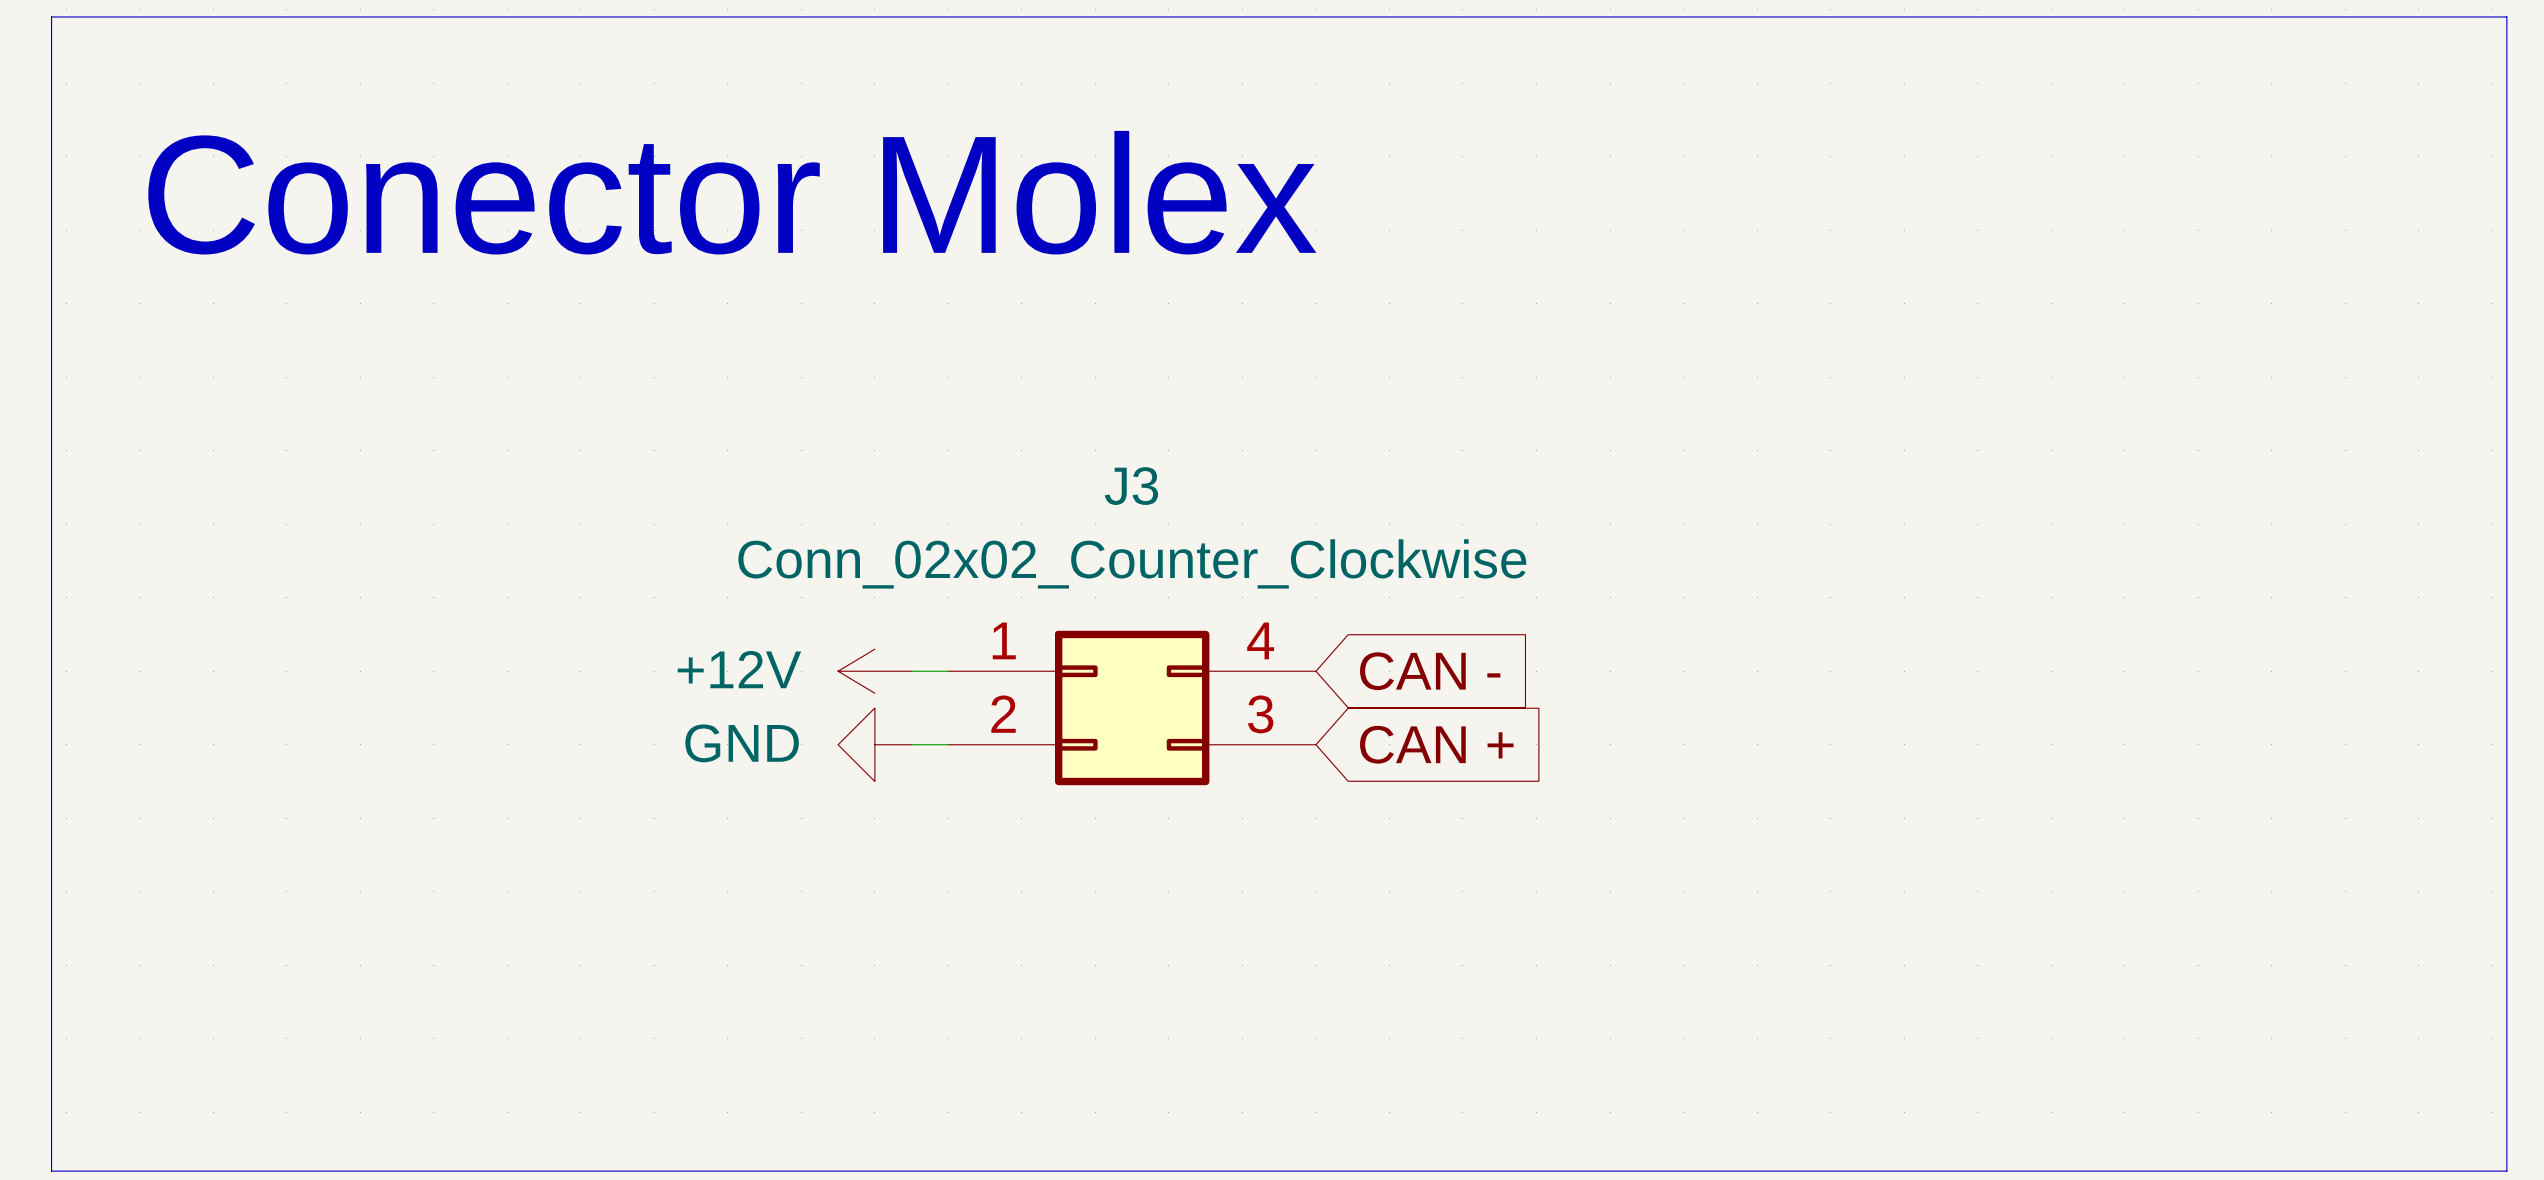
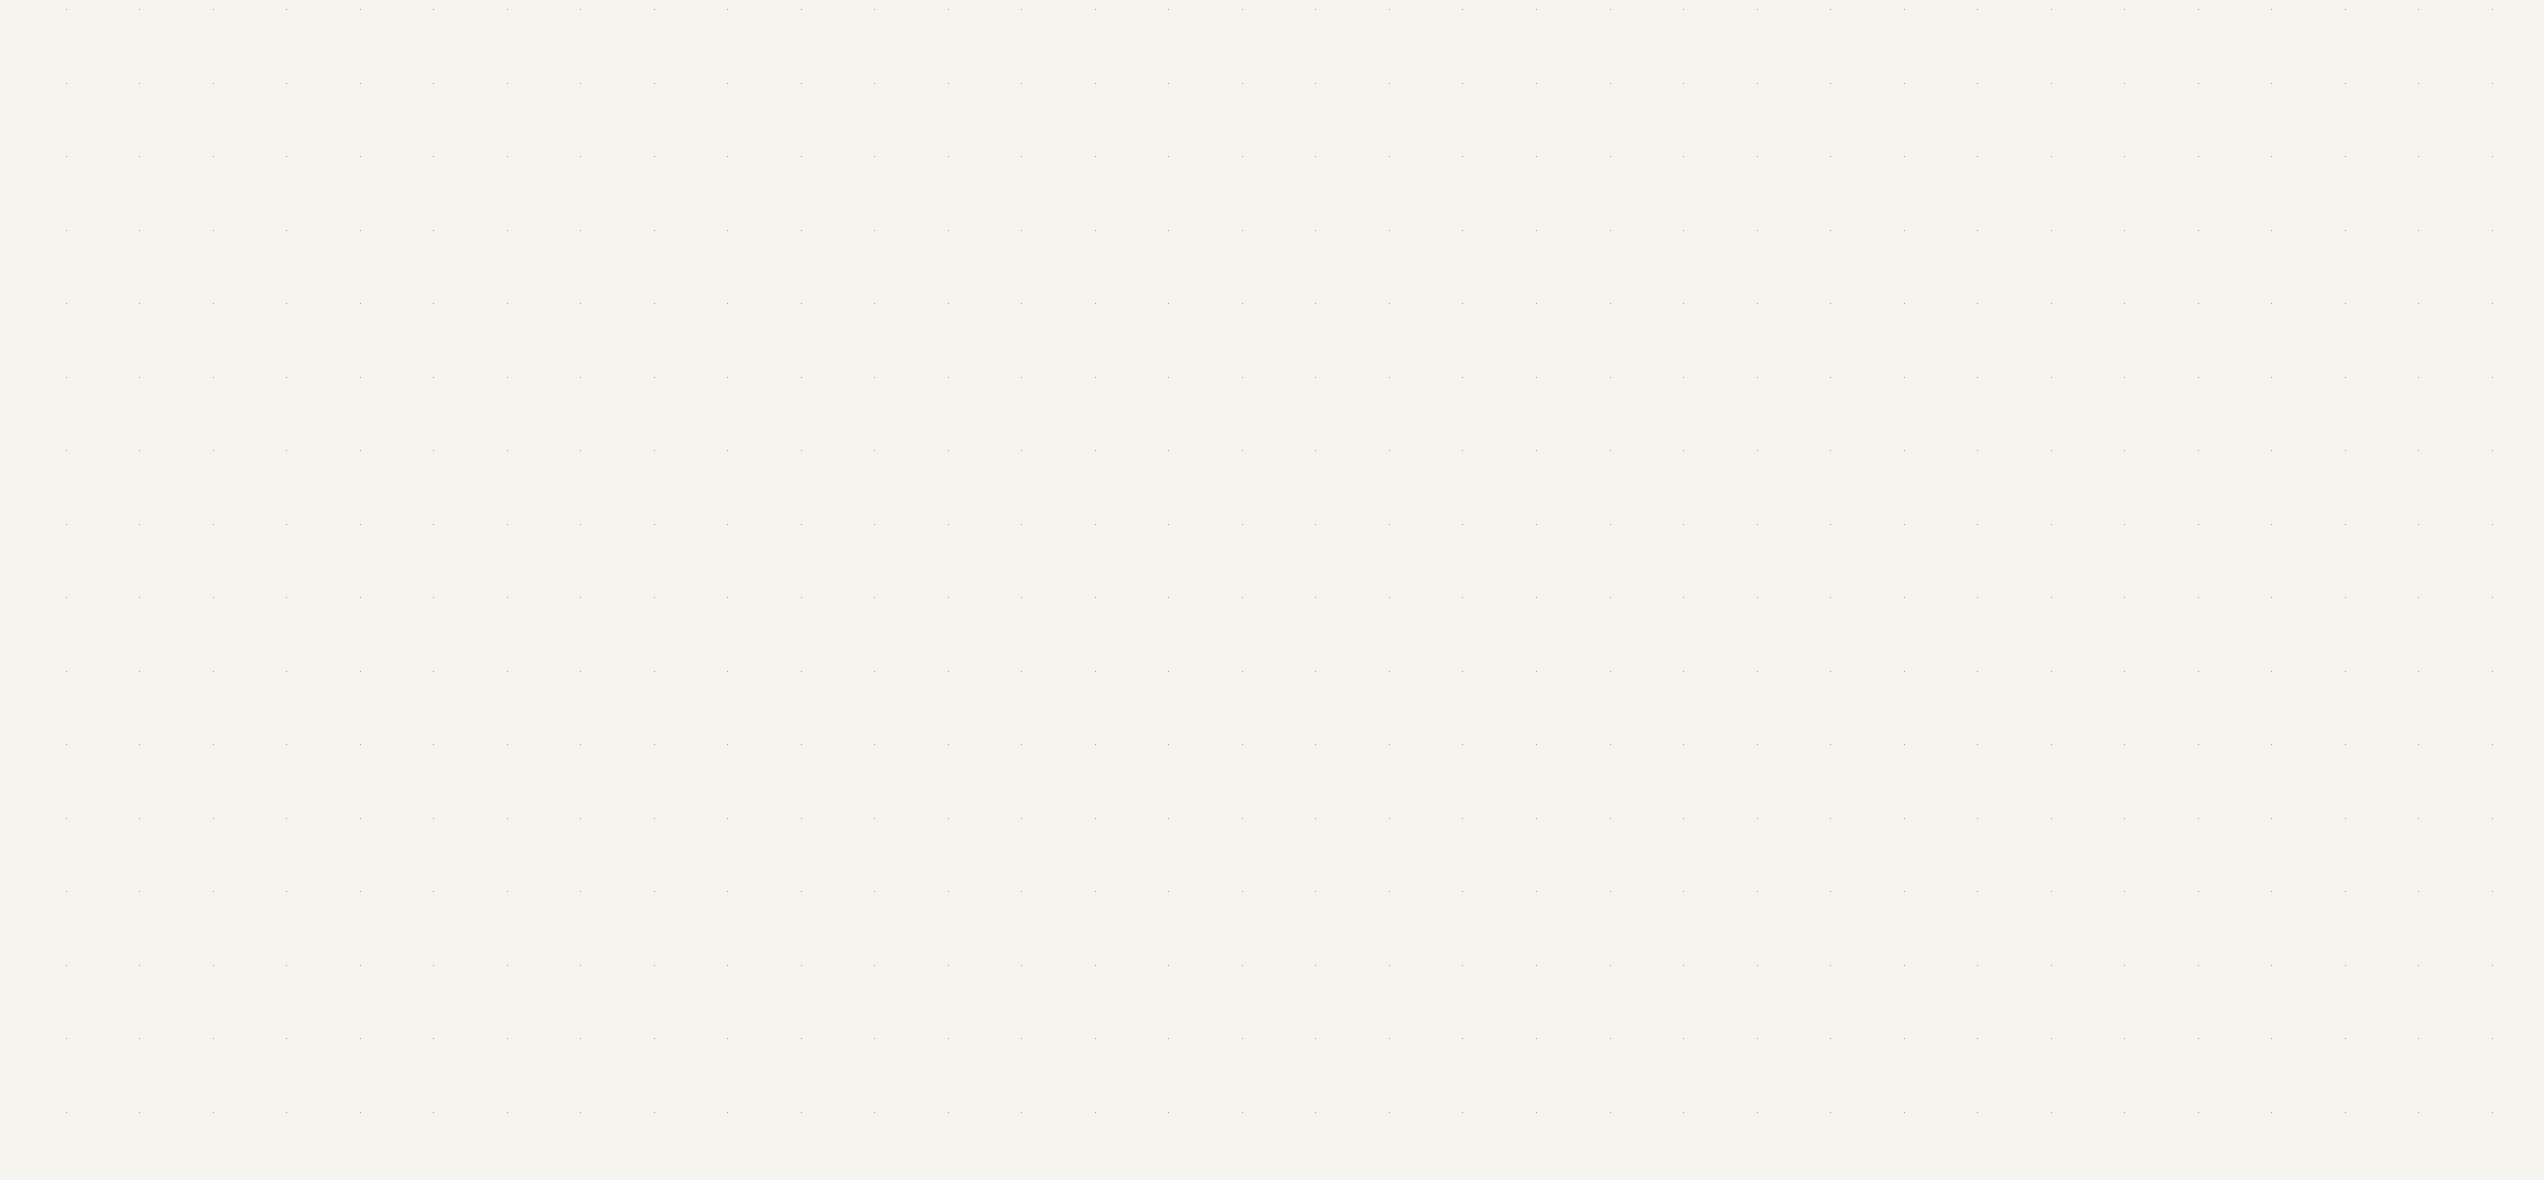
line: (51, 16) (2506, 16) (2506, 1171) (51, 1171) (51, 16) -> none
text: Conector Molex (732, 192) -> none
power symbol: +12V (874, 671) -> none
wire: (911, 671) (948, 671) -> none
global label: CAN - (1430, 671) -> none
J3: Conn_02x02_Counter_Clockwise (1132, 708) -> none
power symbol: GND (874, 744) -> none
wire: (911, 744) (948, 744) -> none
global label: CAN + (1436, 744) -> none

